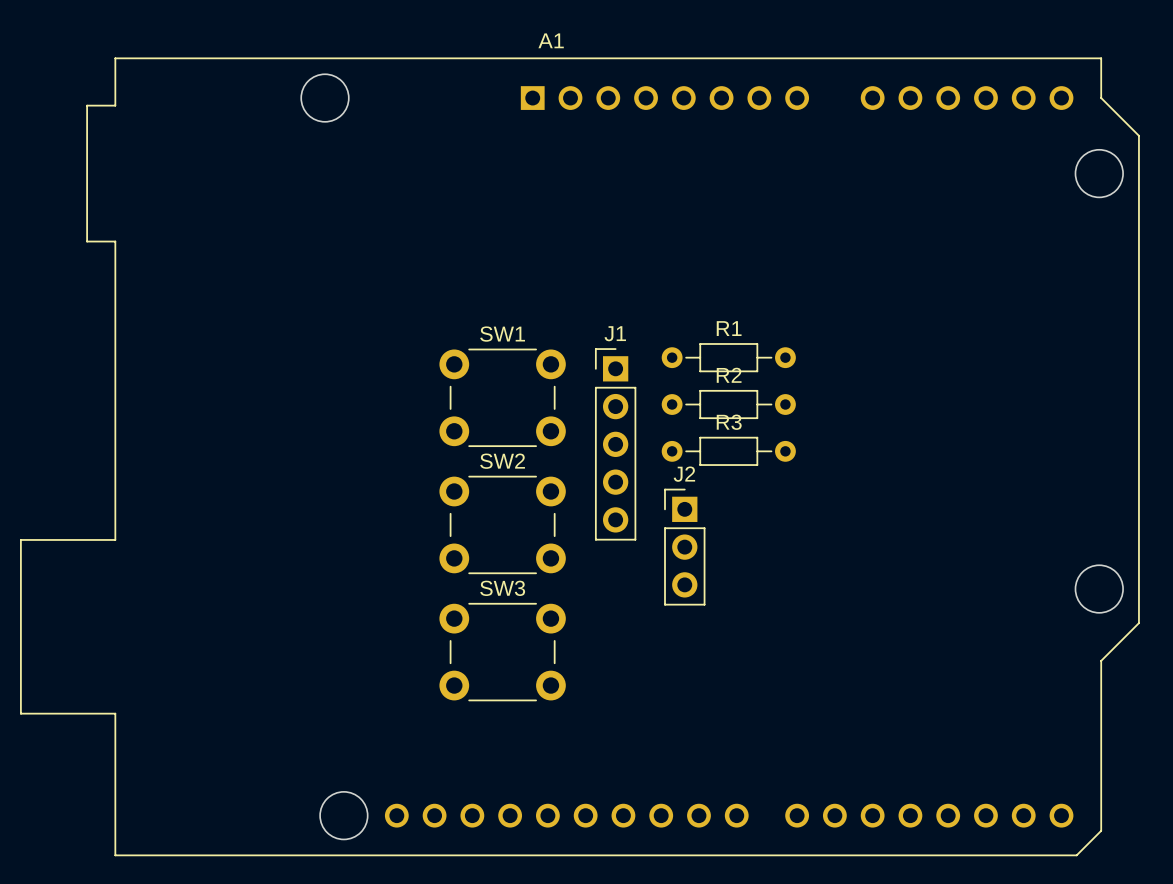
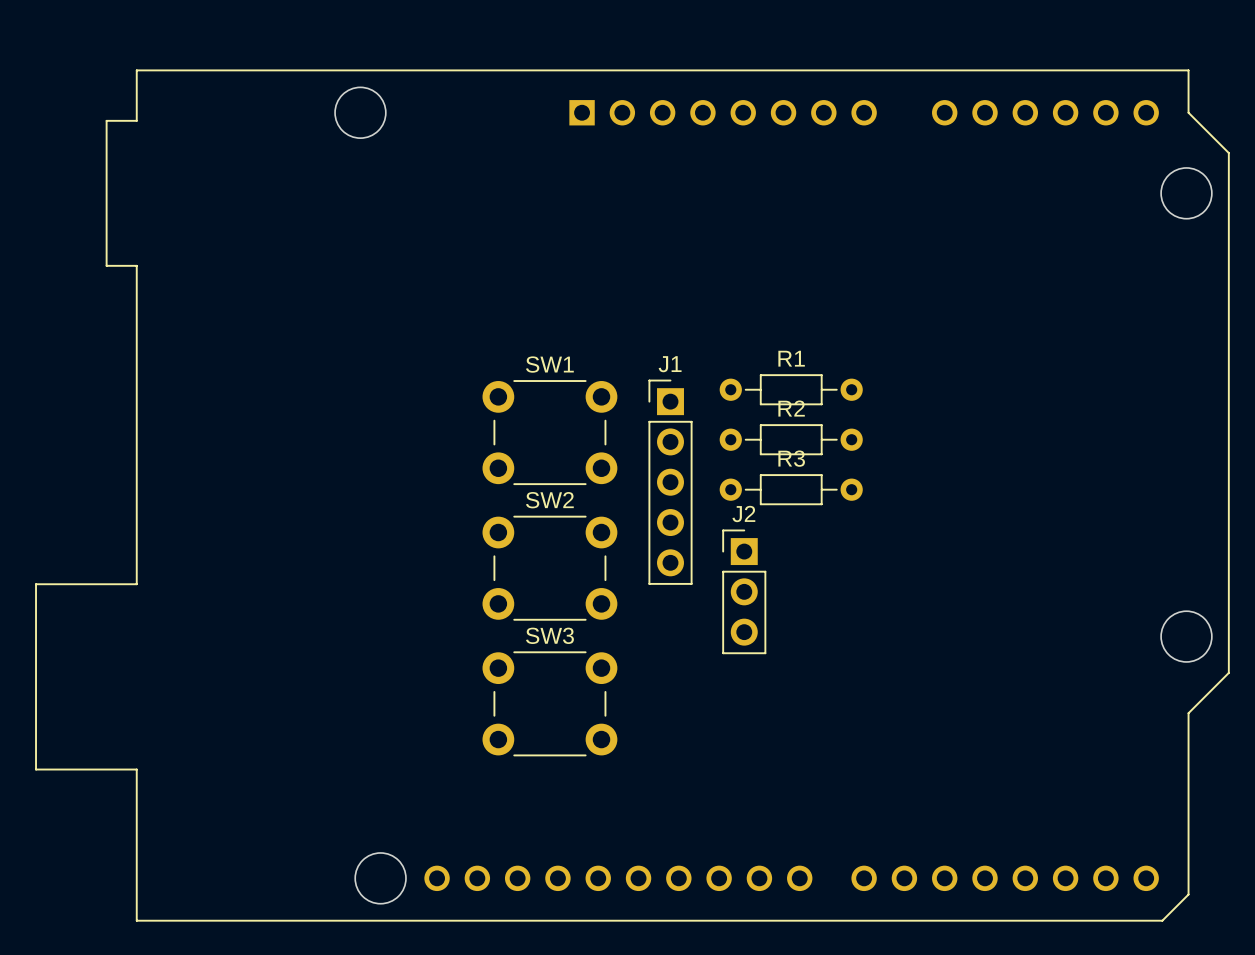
A1 name: A1 (551, 40) -> none

